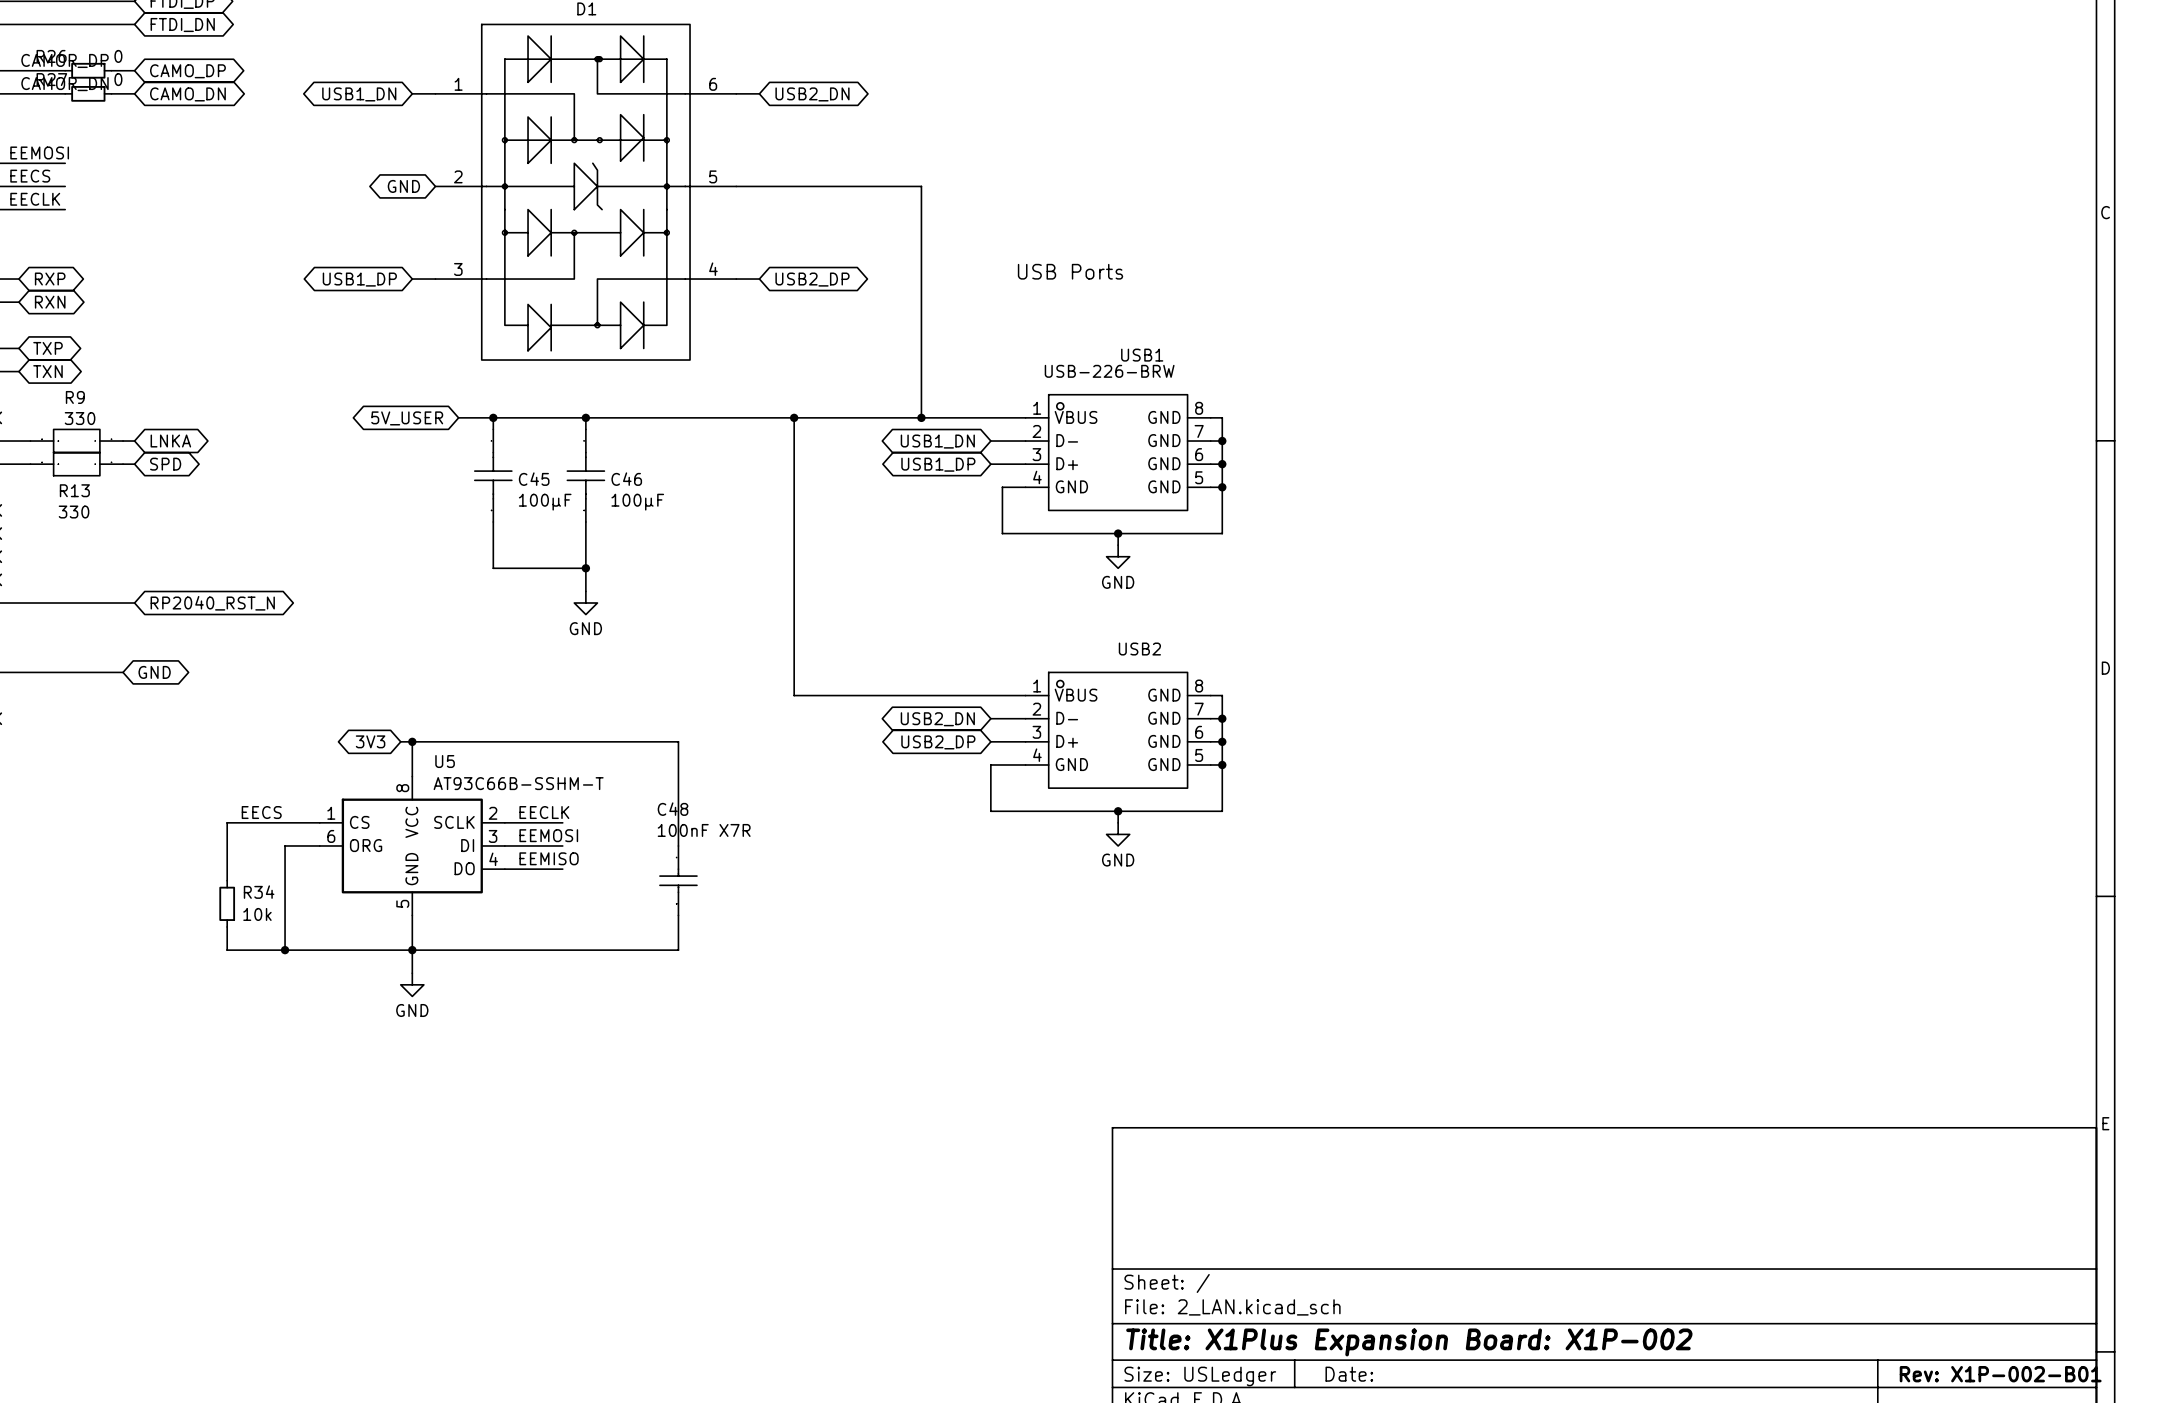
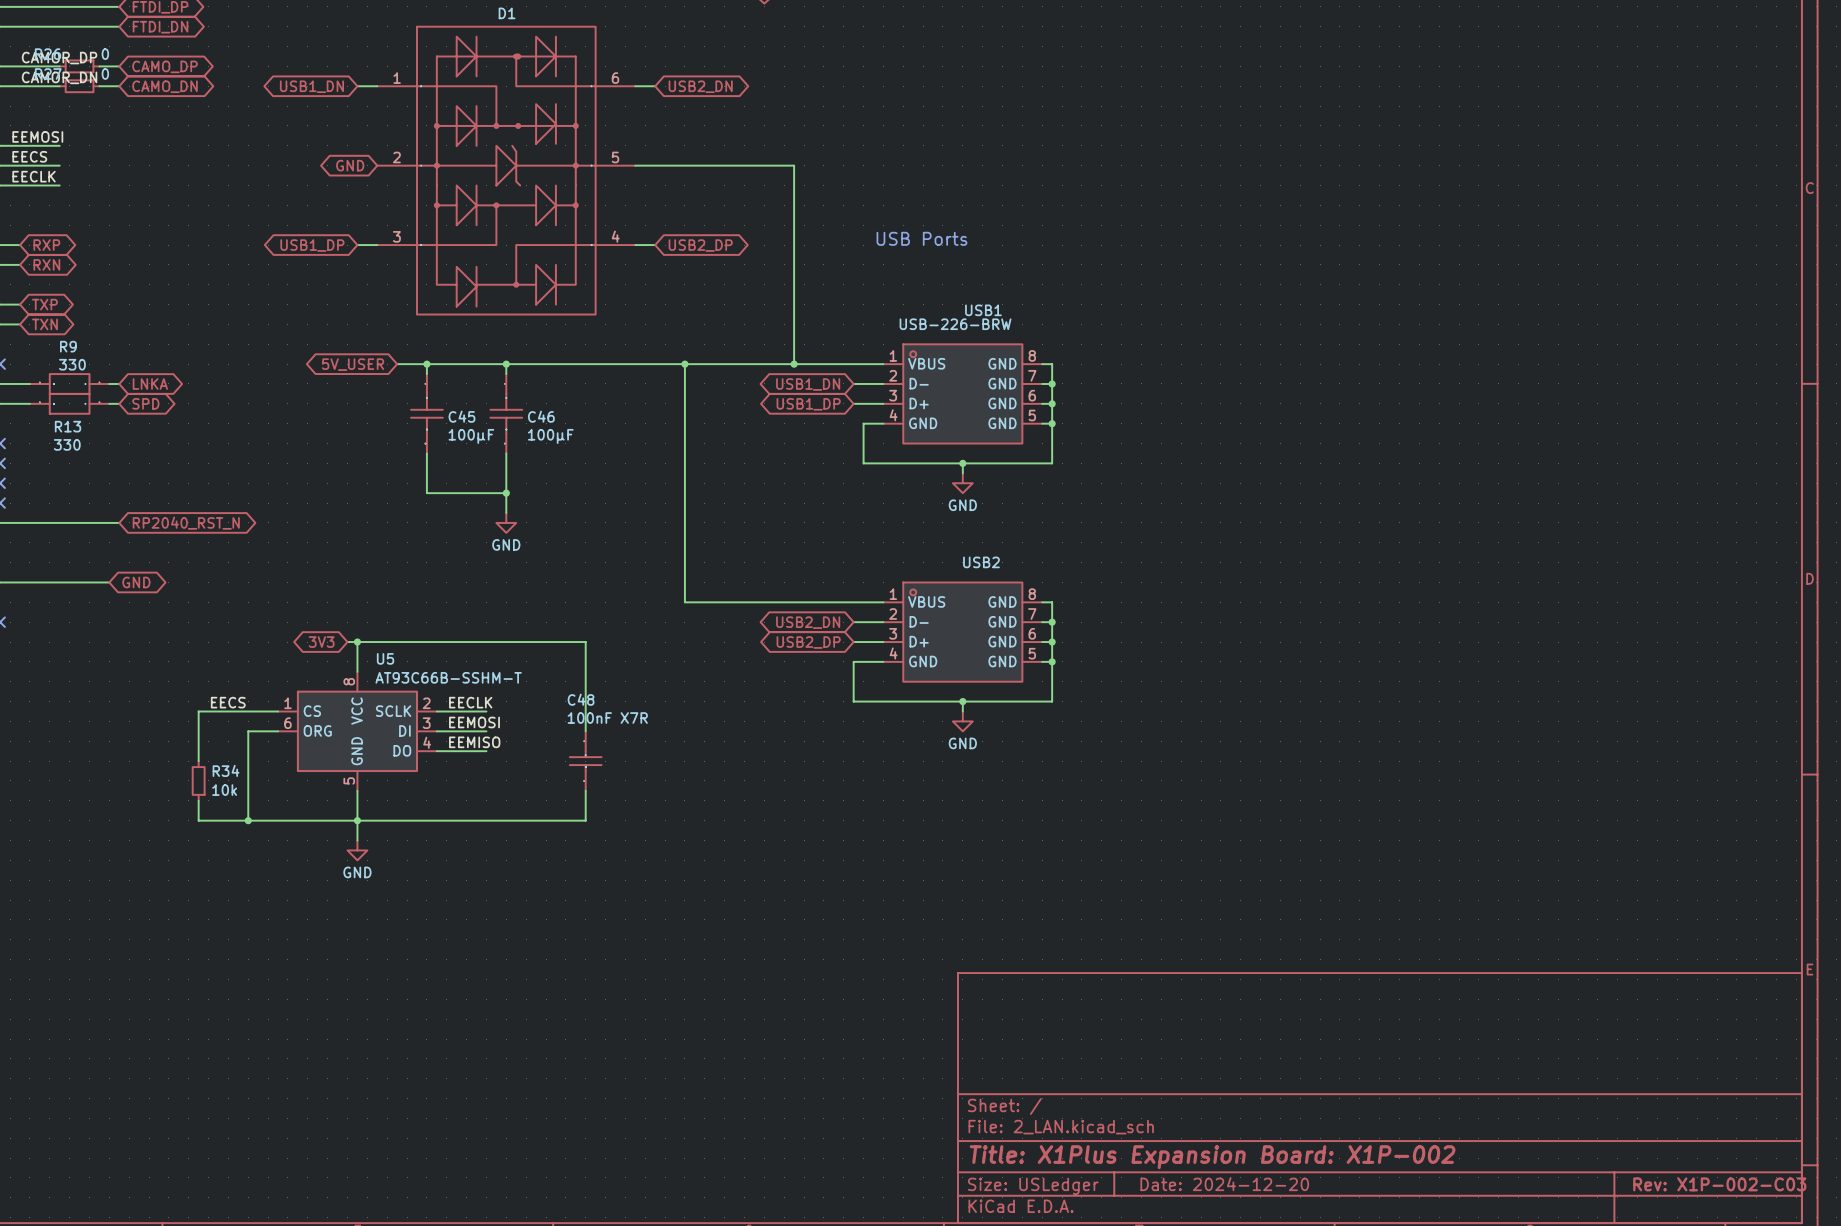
title block: Date: (1349, 1374) -> Date: 2024-12-20 (1224, 1184)
title block: Rev: X1P-002-B01 (2000, 1374) -> Rev: X1P-002-C03 (1719, 1184)

